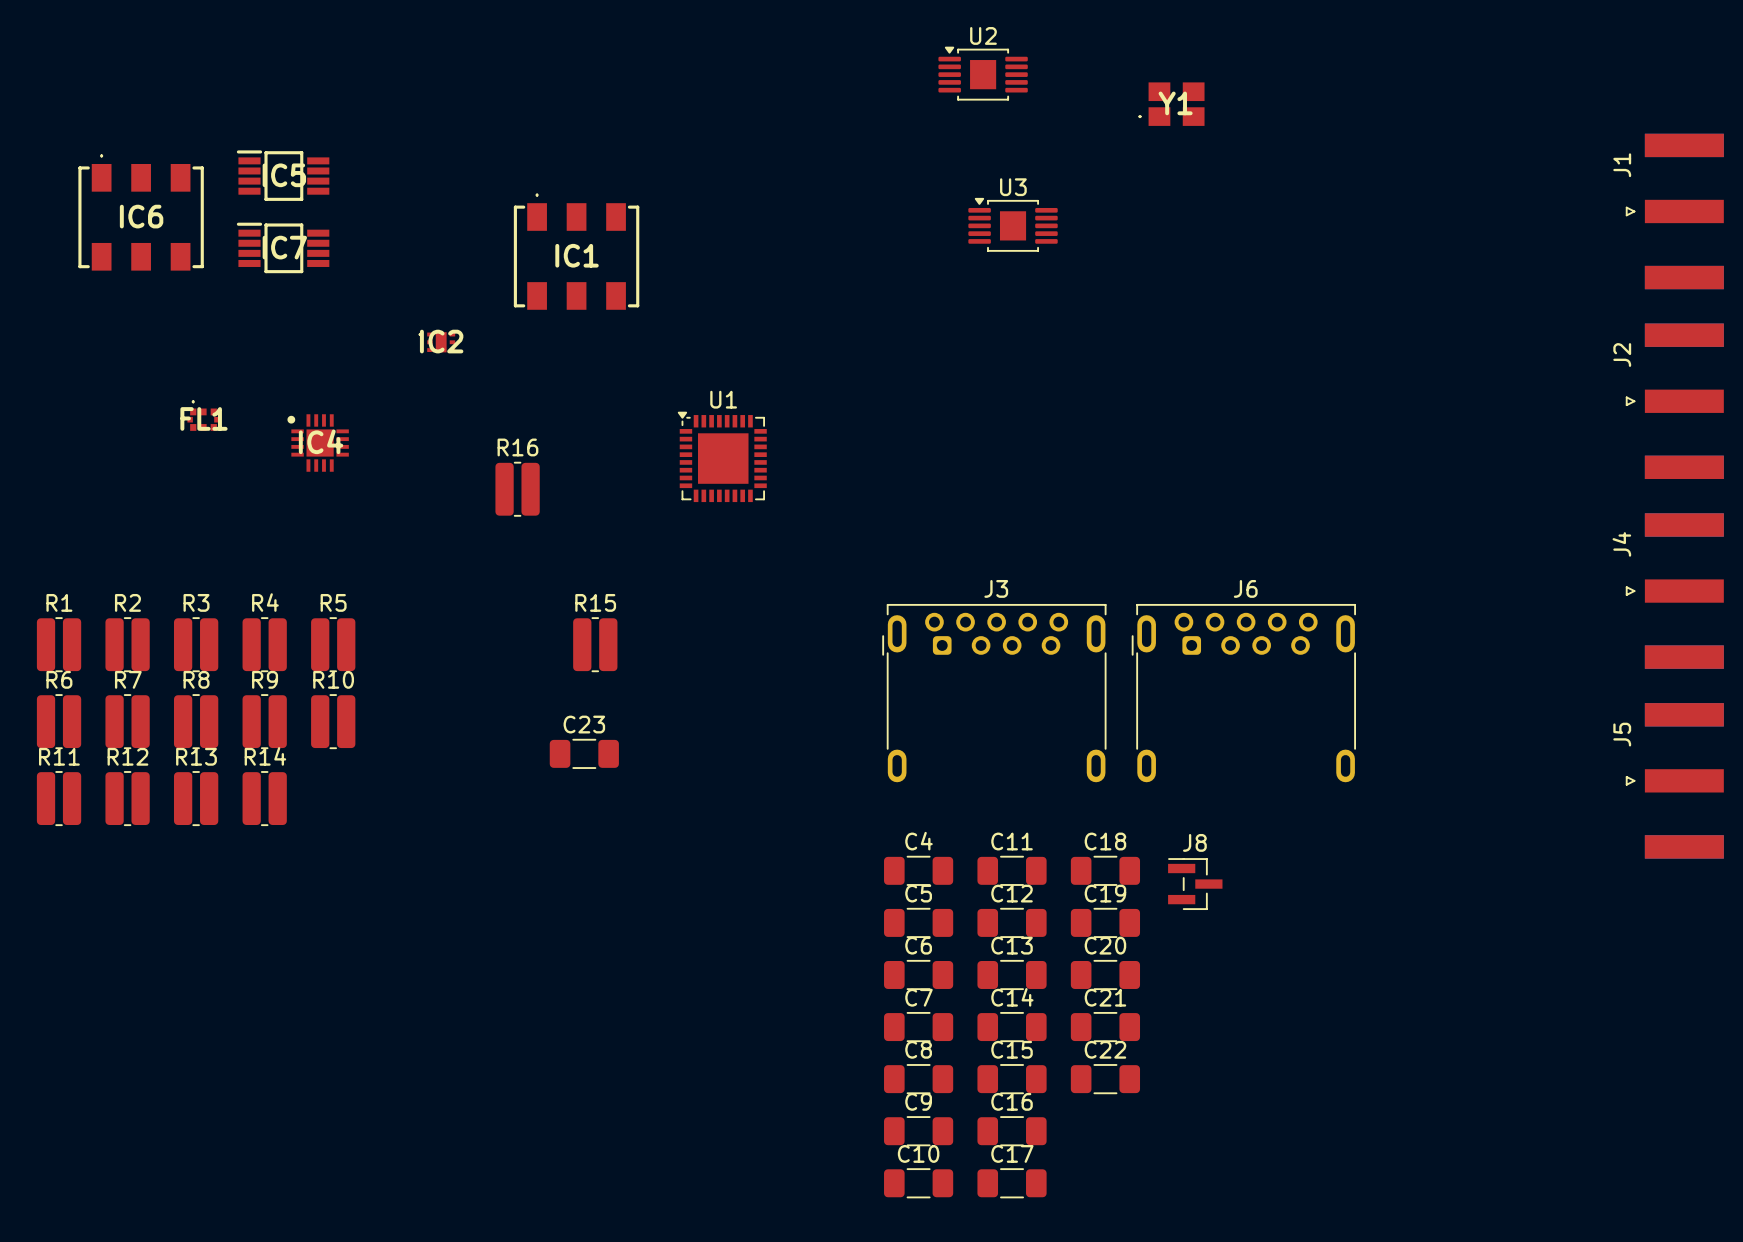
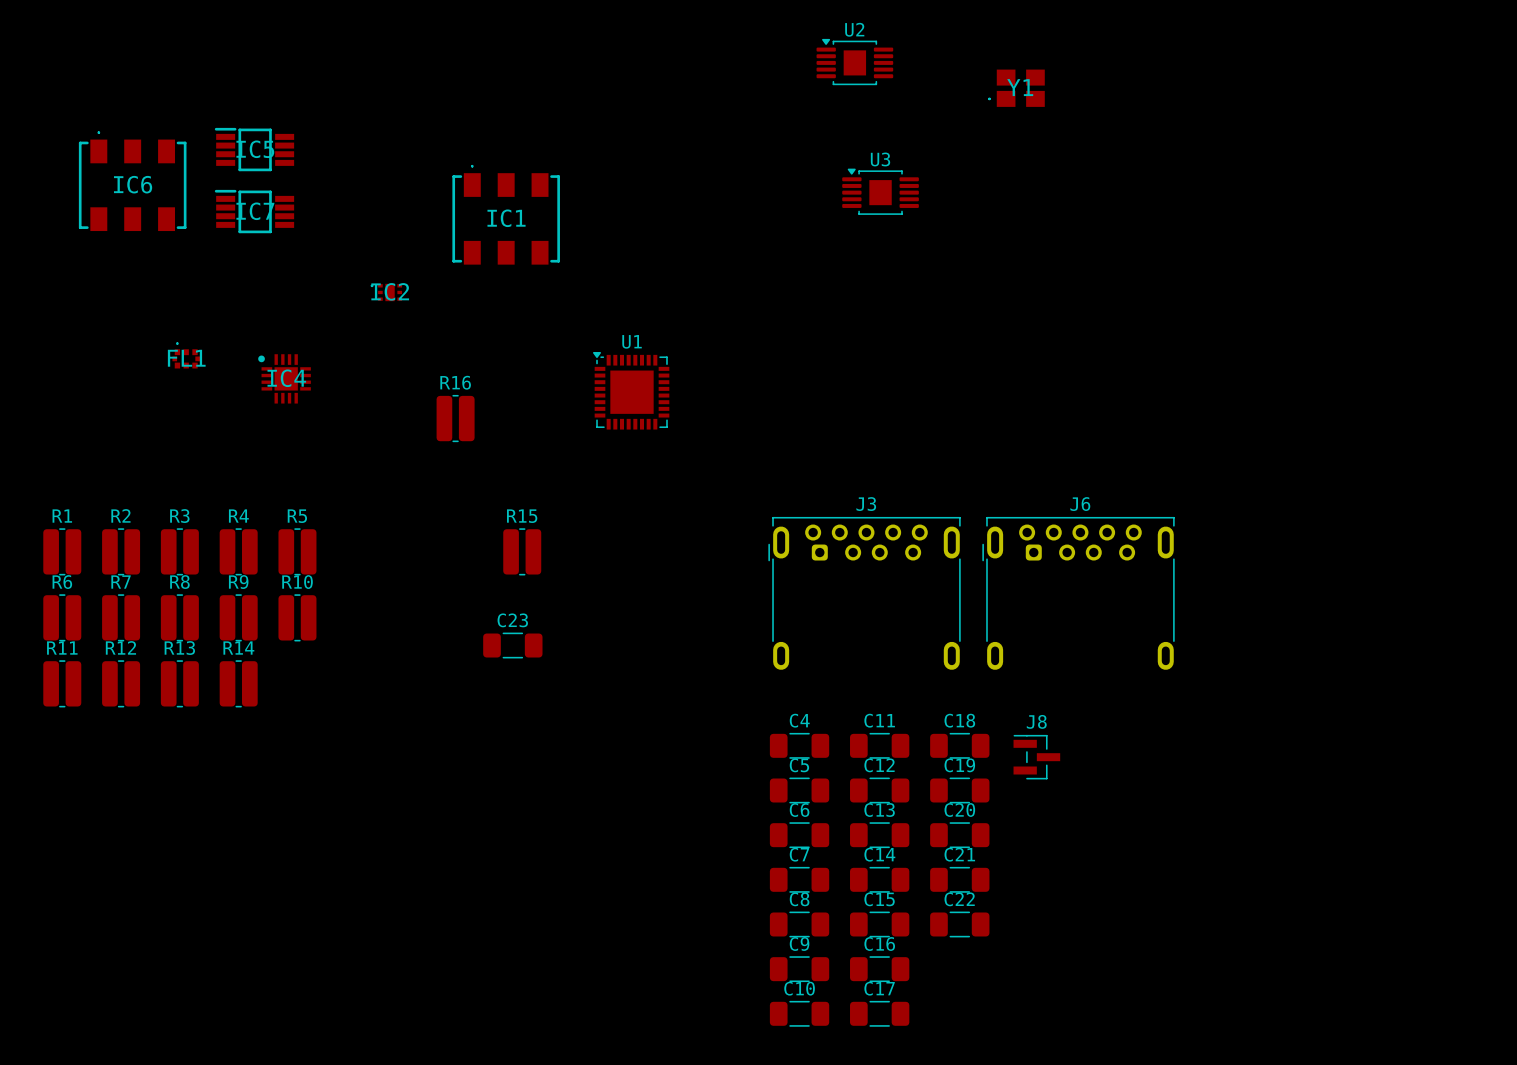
J1: (1674, 211) -> none
J2: (1674, 401) -> none
J4: (1674, 591) -> none
J5: (1674, 780) -> none

